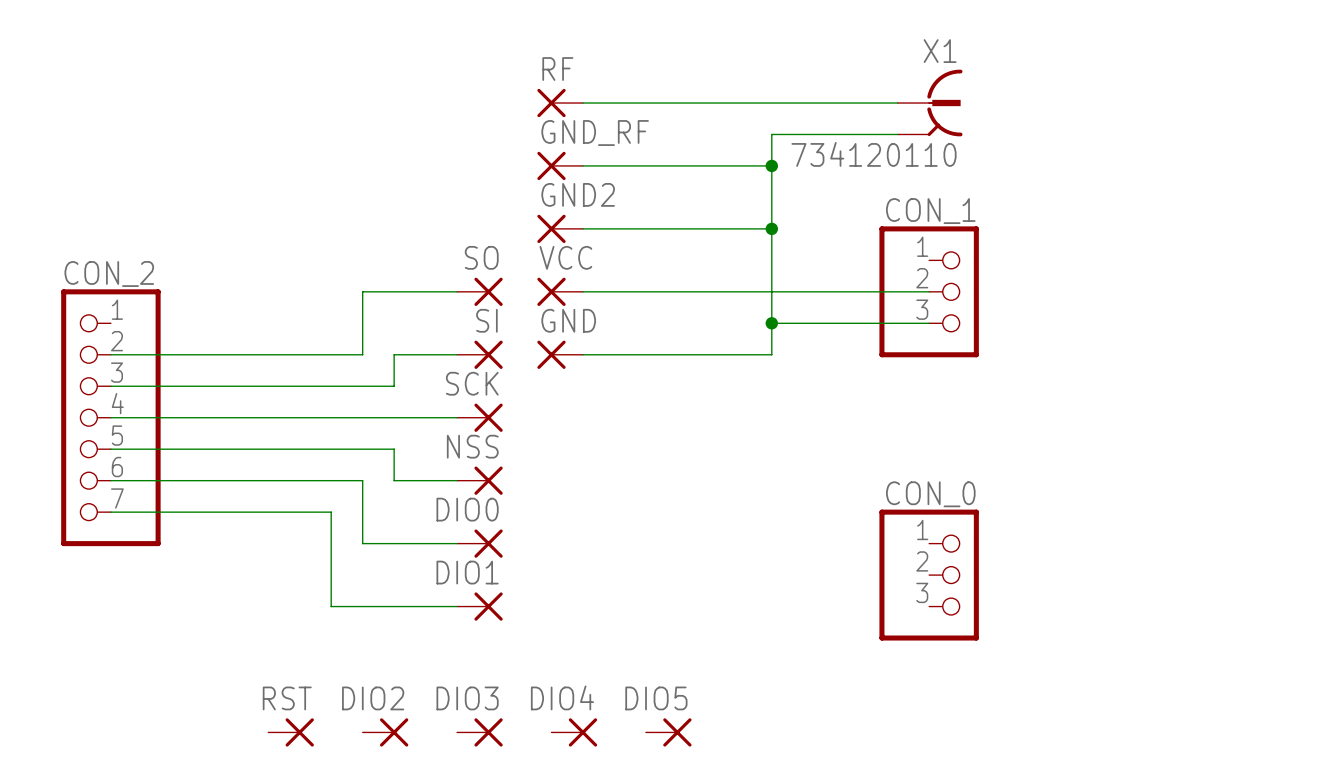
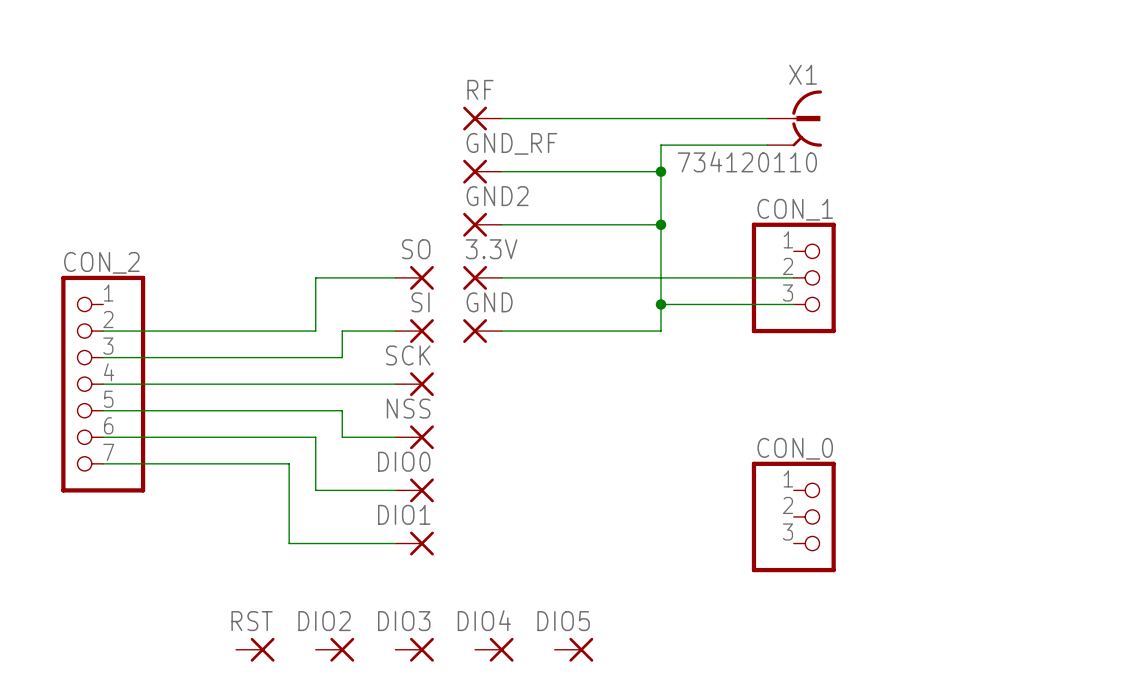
VCC name: VCC (565, 257) -> 3.3V (491, 249)

